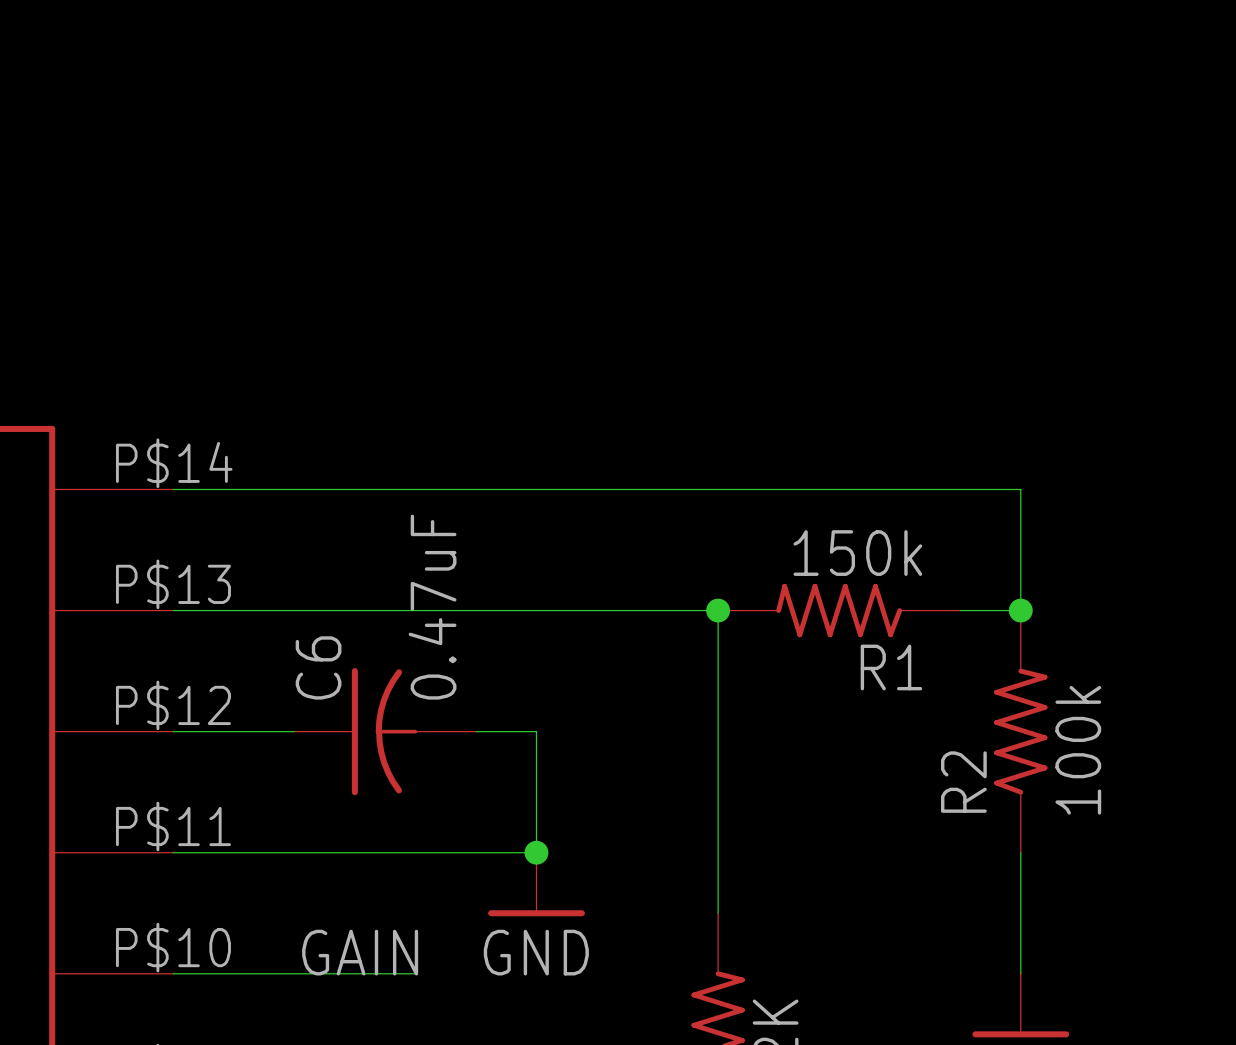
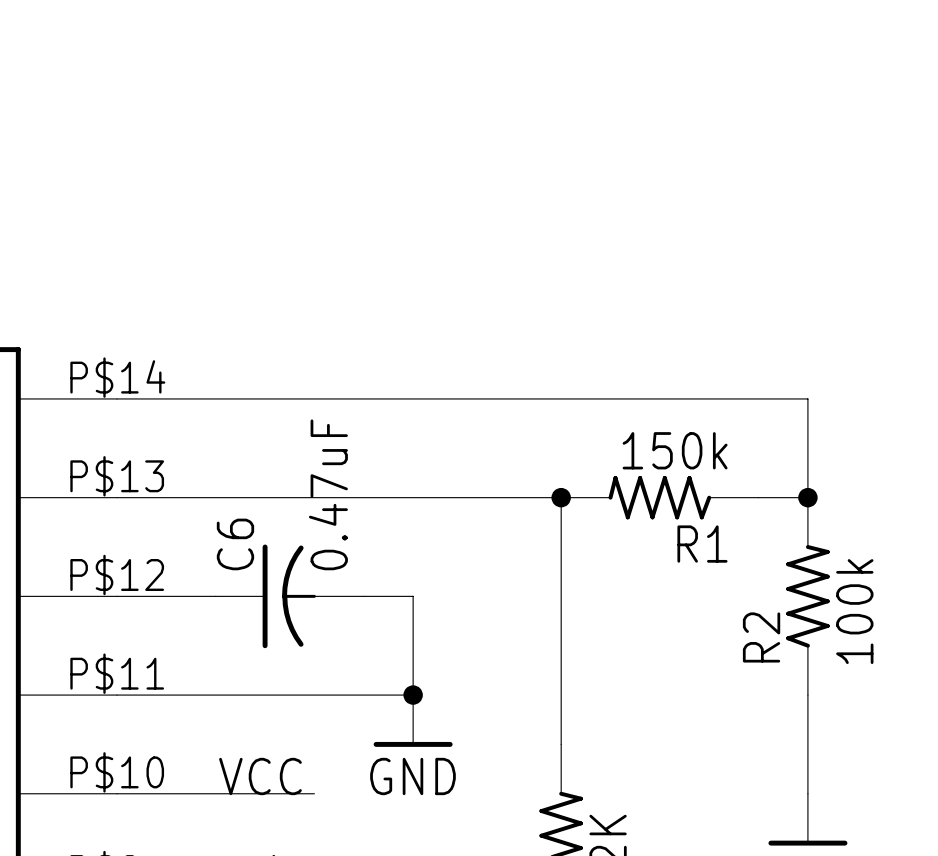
label: GAIN (360, 952) -> VCC (260, 776)

